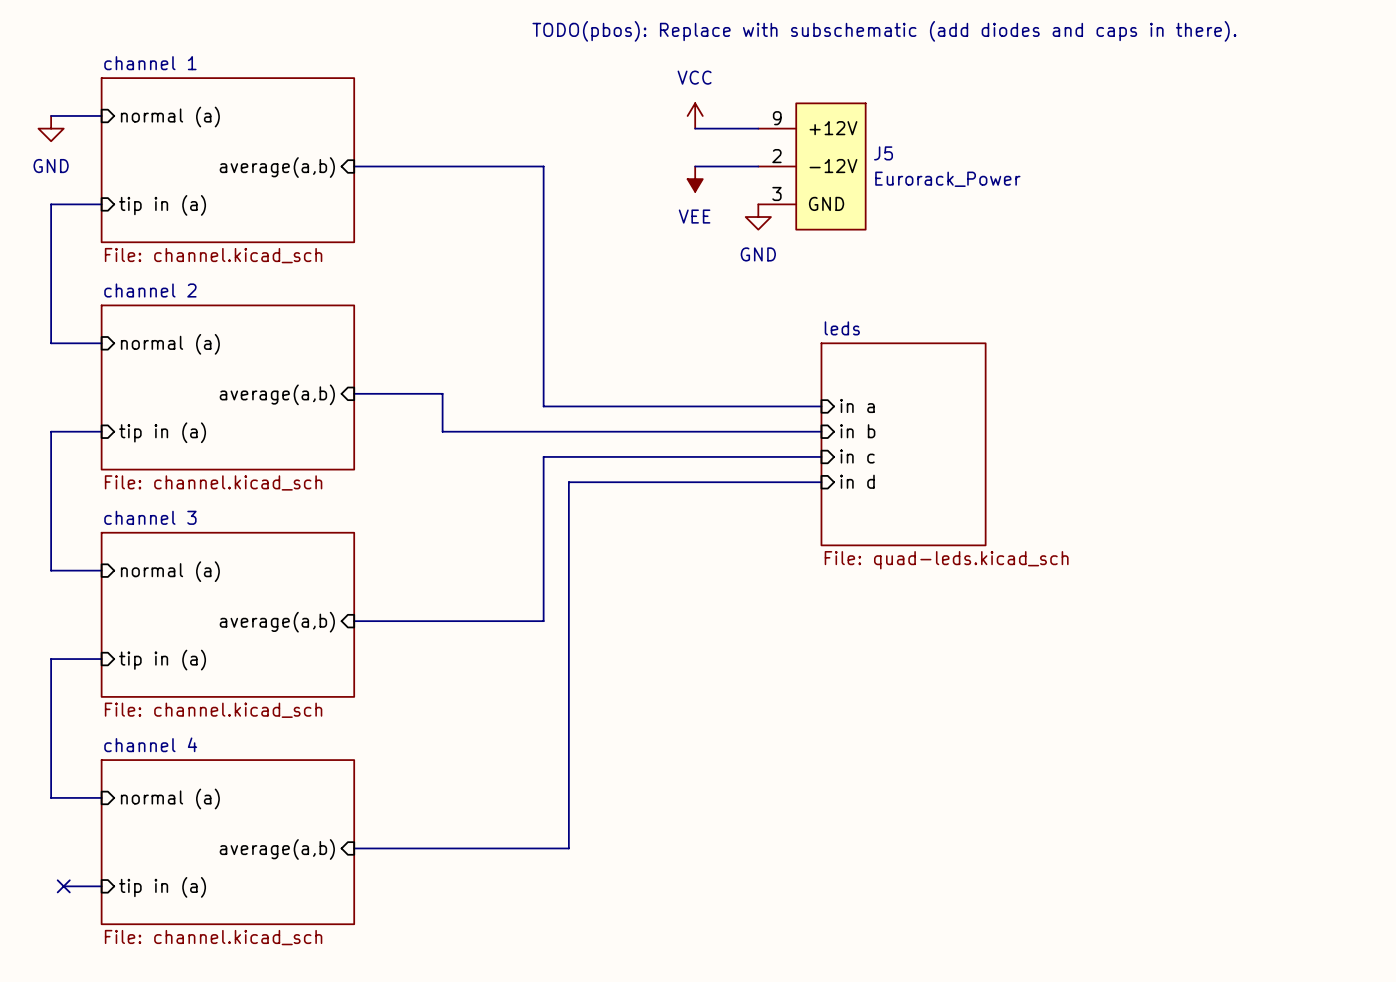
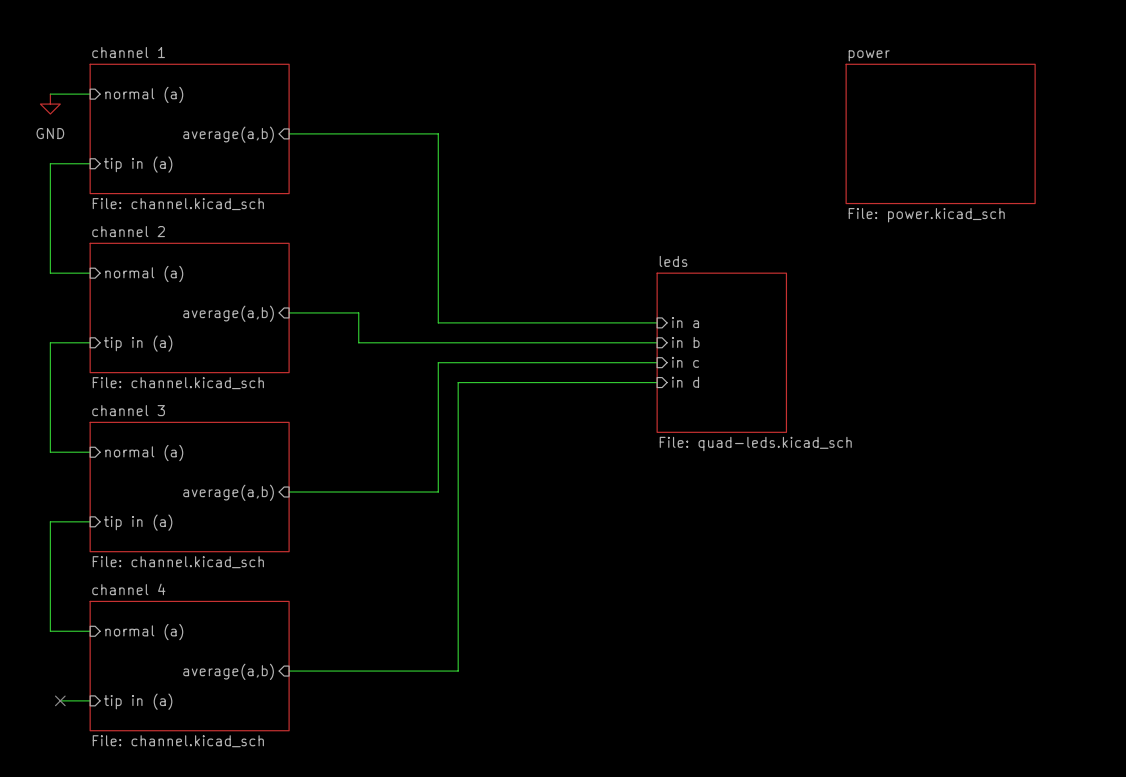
text: TODO(pbos): Replace with subschematic (add diodes and caps in there). (884, 31) -> none
power symbol: VCC (695, 115) -> none
wire: (695, 128) (758, 128) -> none
wire: (695, 166) (758, 166) -> none
J5: Eurorack_Power (811, 166) -> none
sheet power: none -> File: power.kicad_sch (940, 133)
power symbol: VEE (695, 179) -> none
power symbol: GND (758, 217) -> none

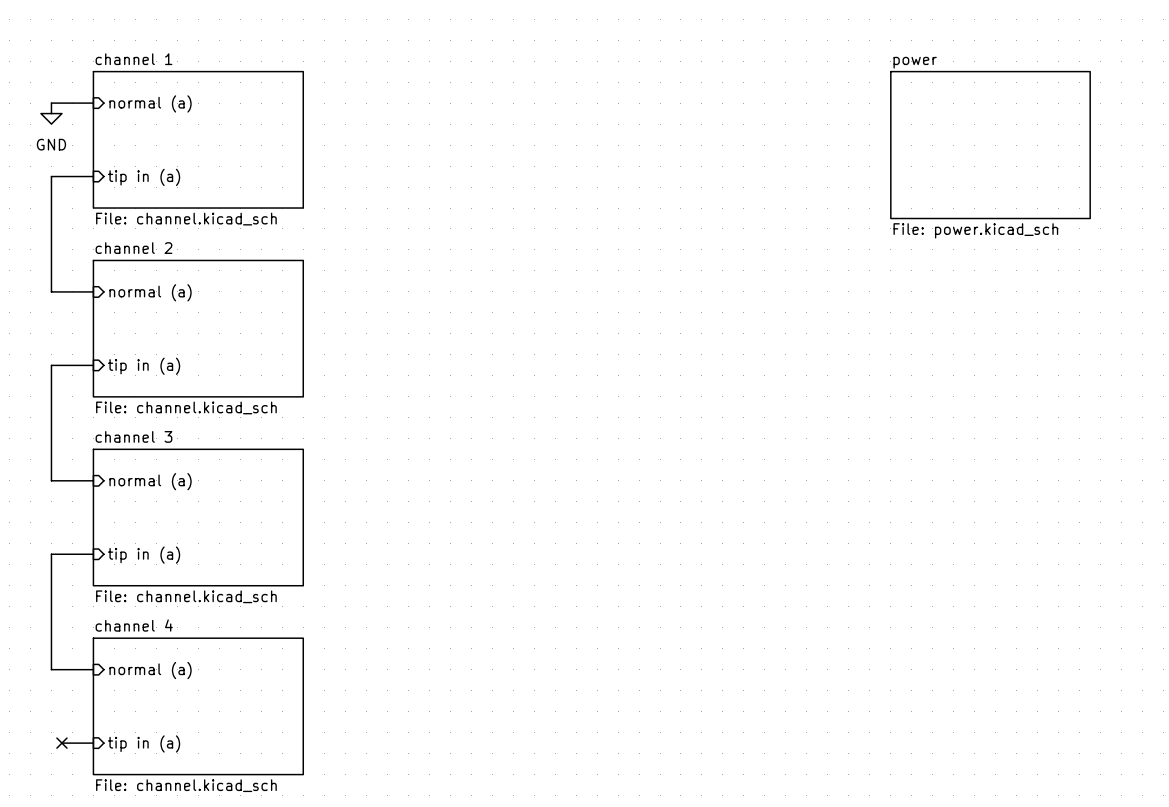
wire: (289, 133) (438, 133) (438, 322) (657, 322) -> none
sheet pin: average(a,b) (228, 134) -> none
wire: (289, 312) (358, 312) (358, 342) (657, 342) -> none
sheet pin: average(a,b) (228, 313) -> none
sheet pin: in a (685, 322) -> none
sheet pin: in b (685, 342) -> none
sheet leds: File: quad-leds.kicad_sch (721, 352) -> none
wire: (657, 362) (438, 362) (438, 492) (289, 492) -> none
sheet pin: in c (685, 362) -> none
wire: (657, 382) (458, 382) (458, 671) (289, 671) -> none
sheet pin: in d (685, 382) -> none
sheet pin: average(a,b) (228, 492) -> none
sheet pin: average(a,b) (228, 671) -> none

